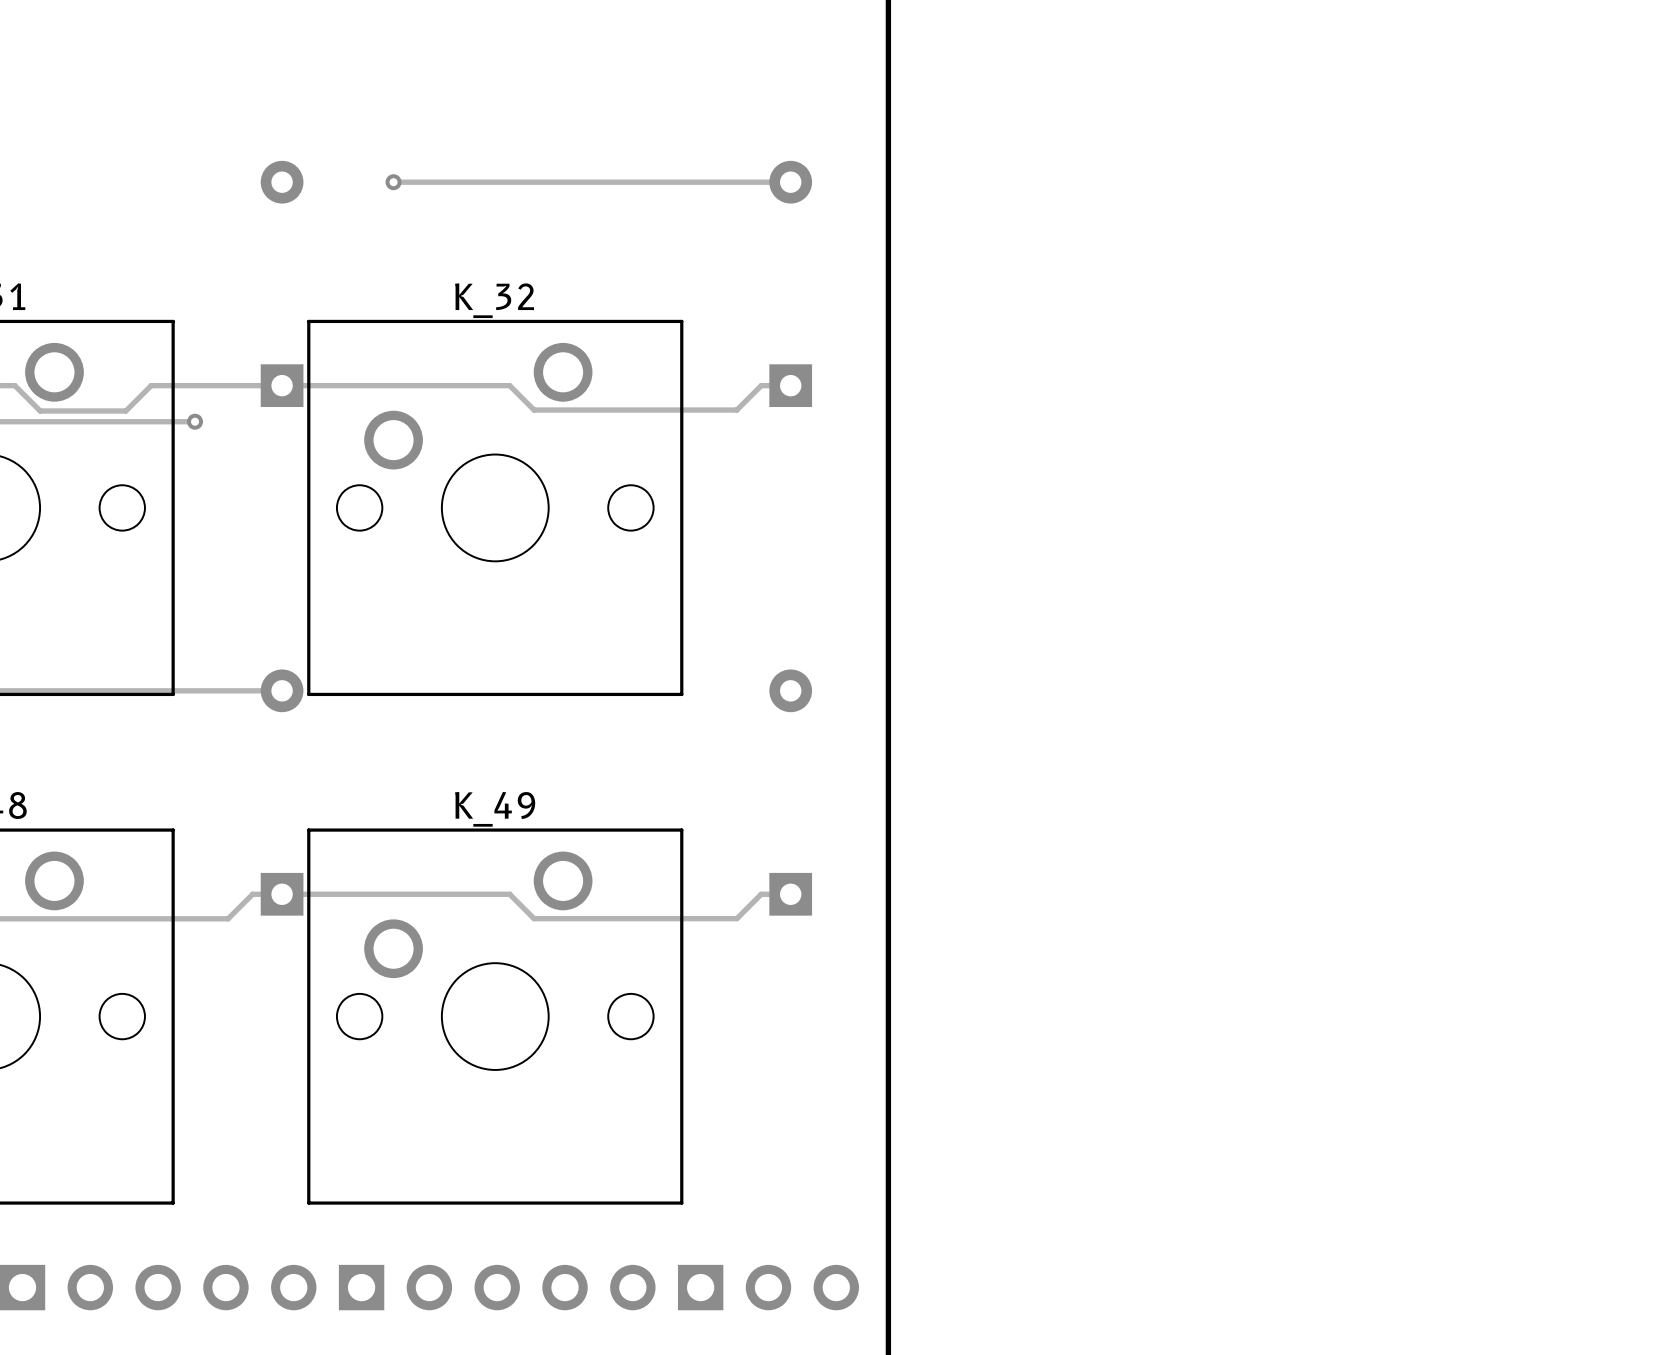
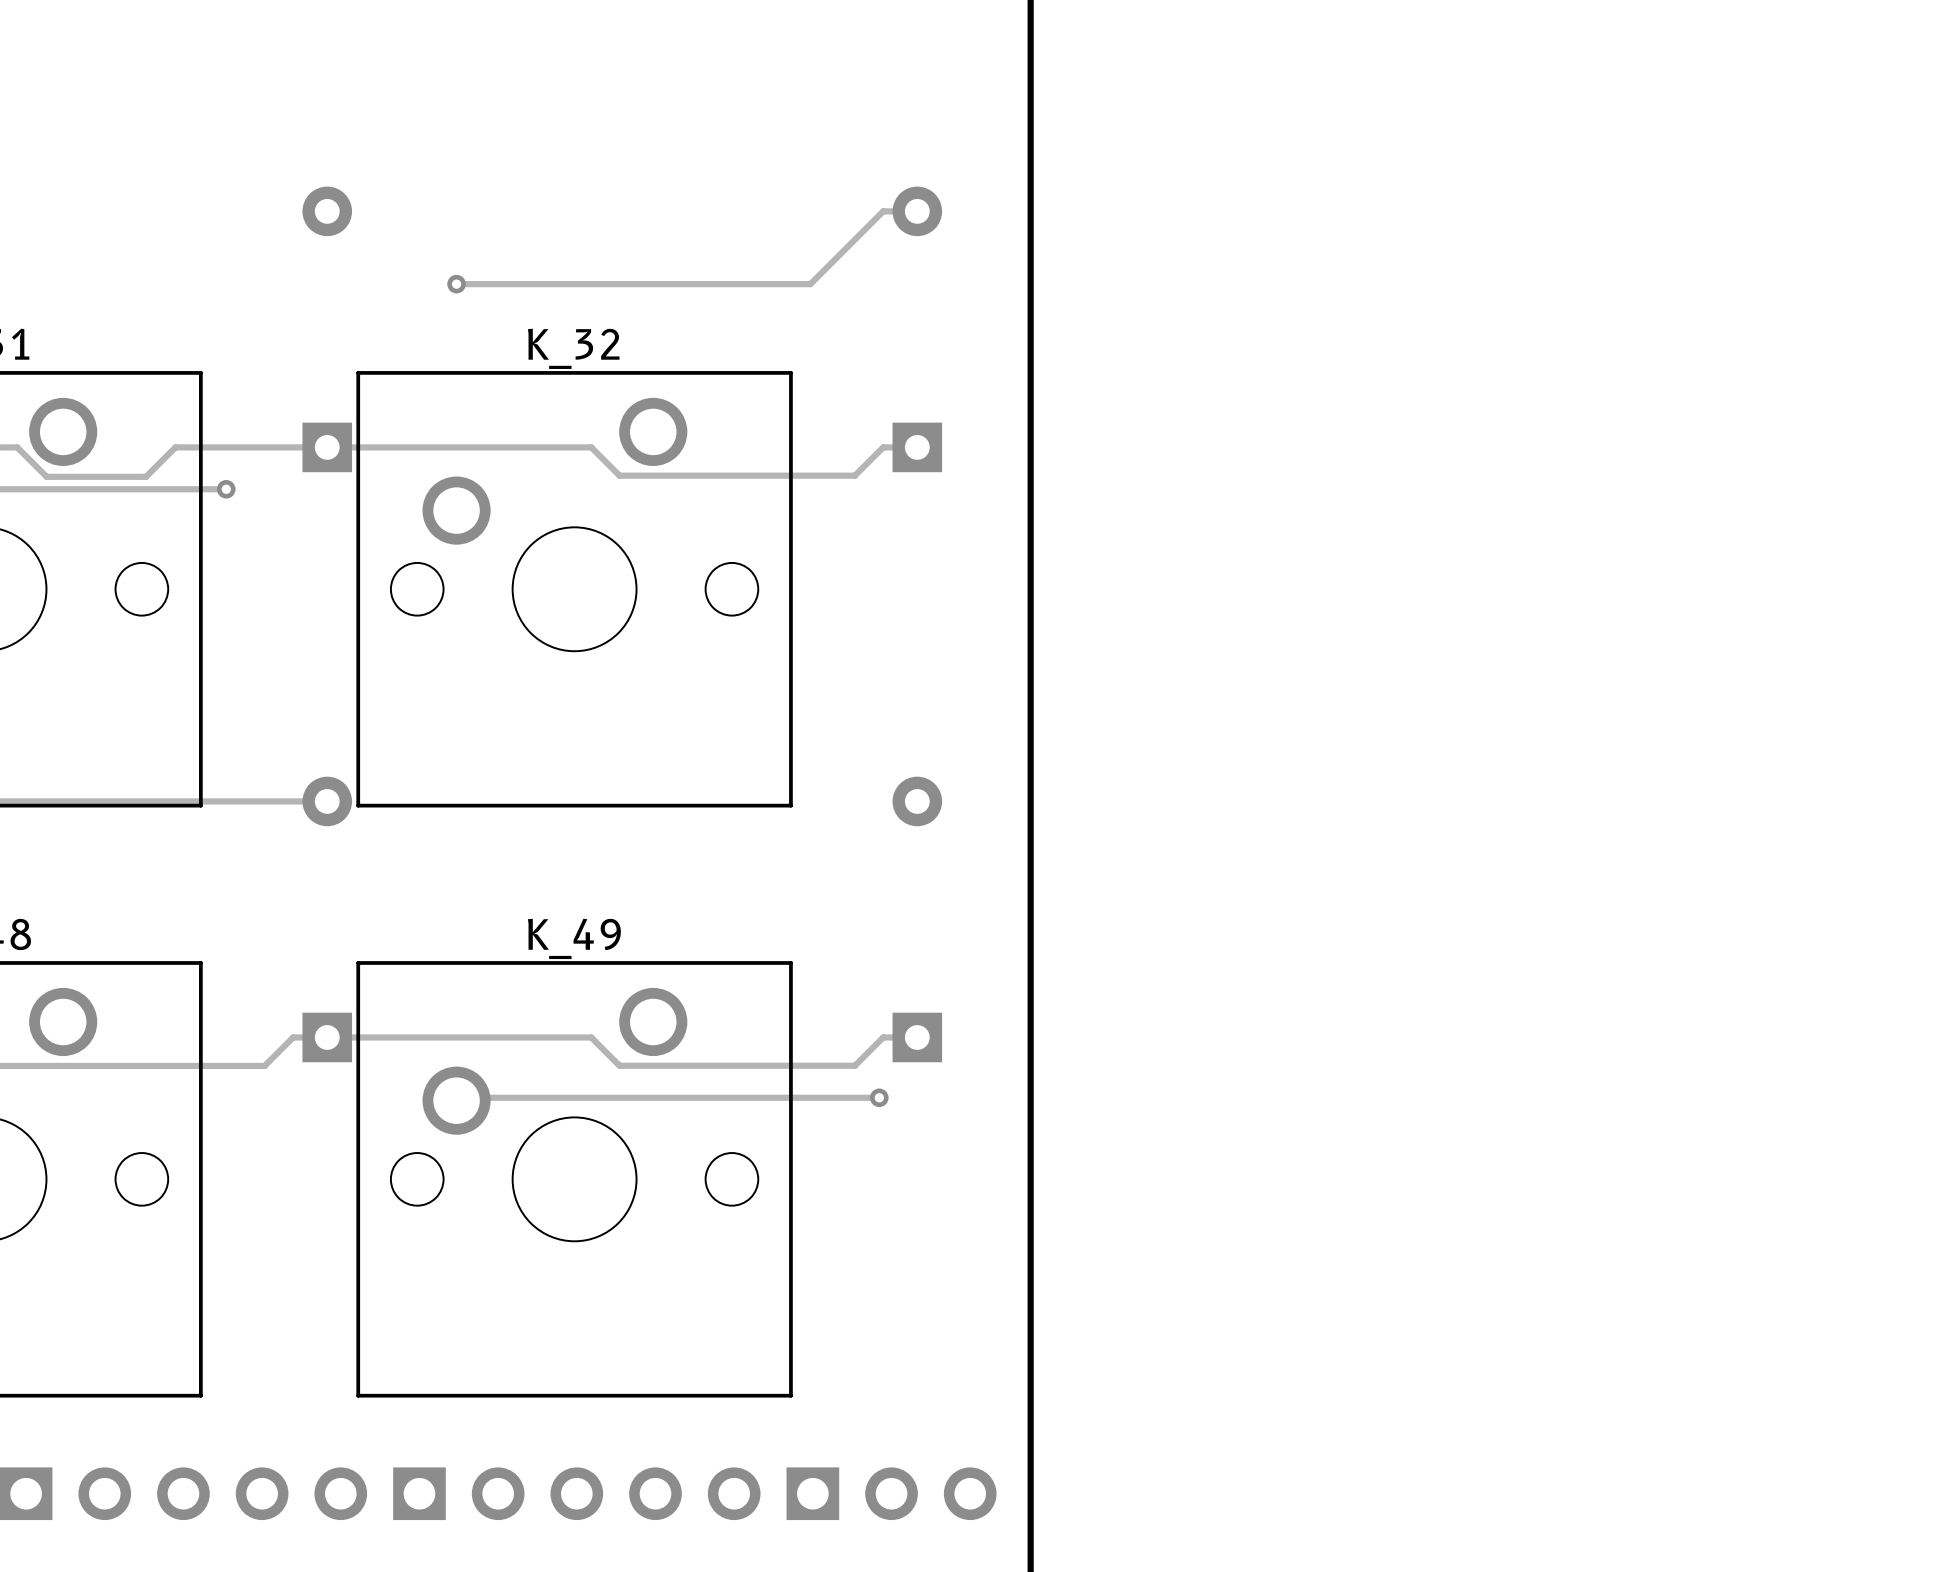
track: (393, 182) (761, 182) -> (456, 284) (810, 284) (883, 211)
via position: (393, 182) -> (456, 284)
track: none -> (879, 1097) (459, 1097) (456, 1100)
via: none -> (879, 1097)

